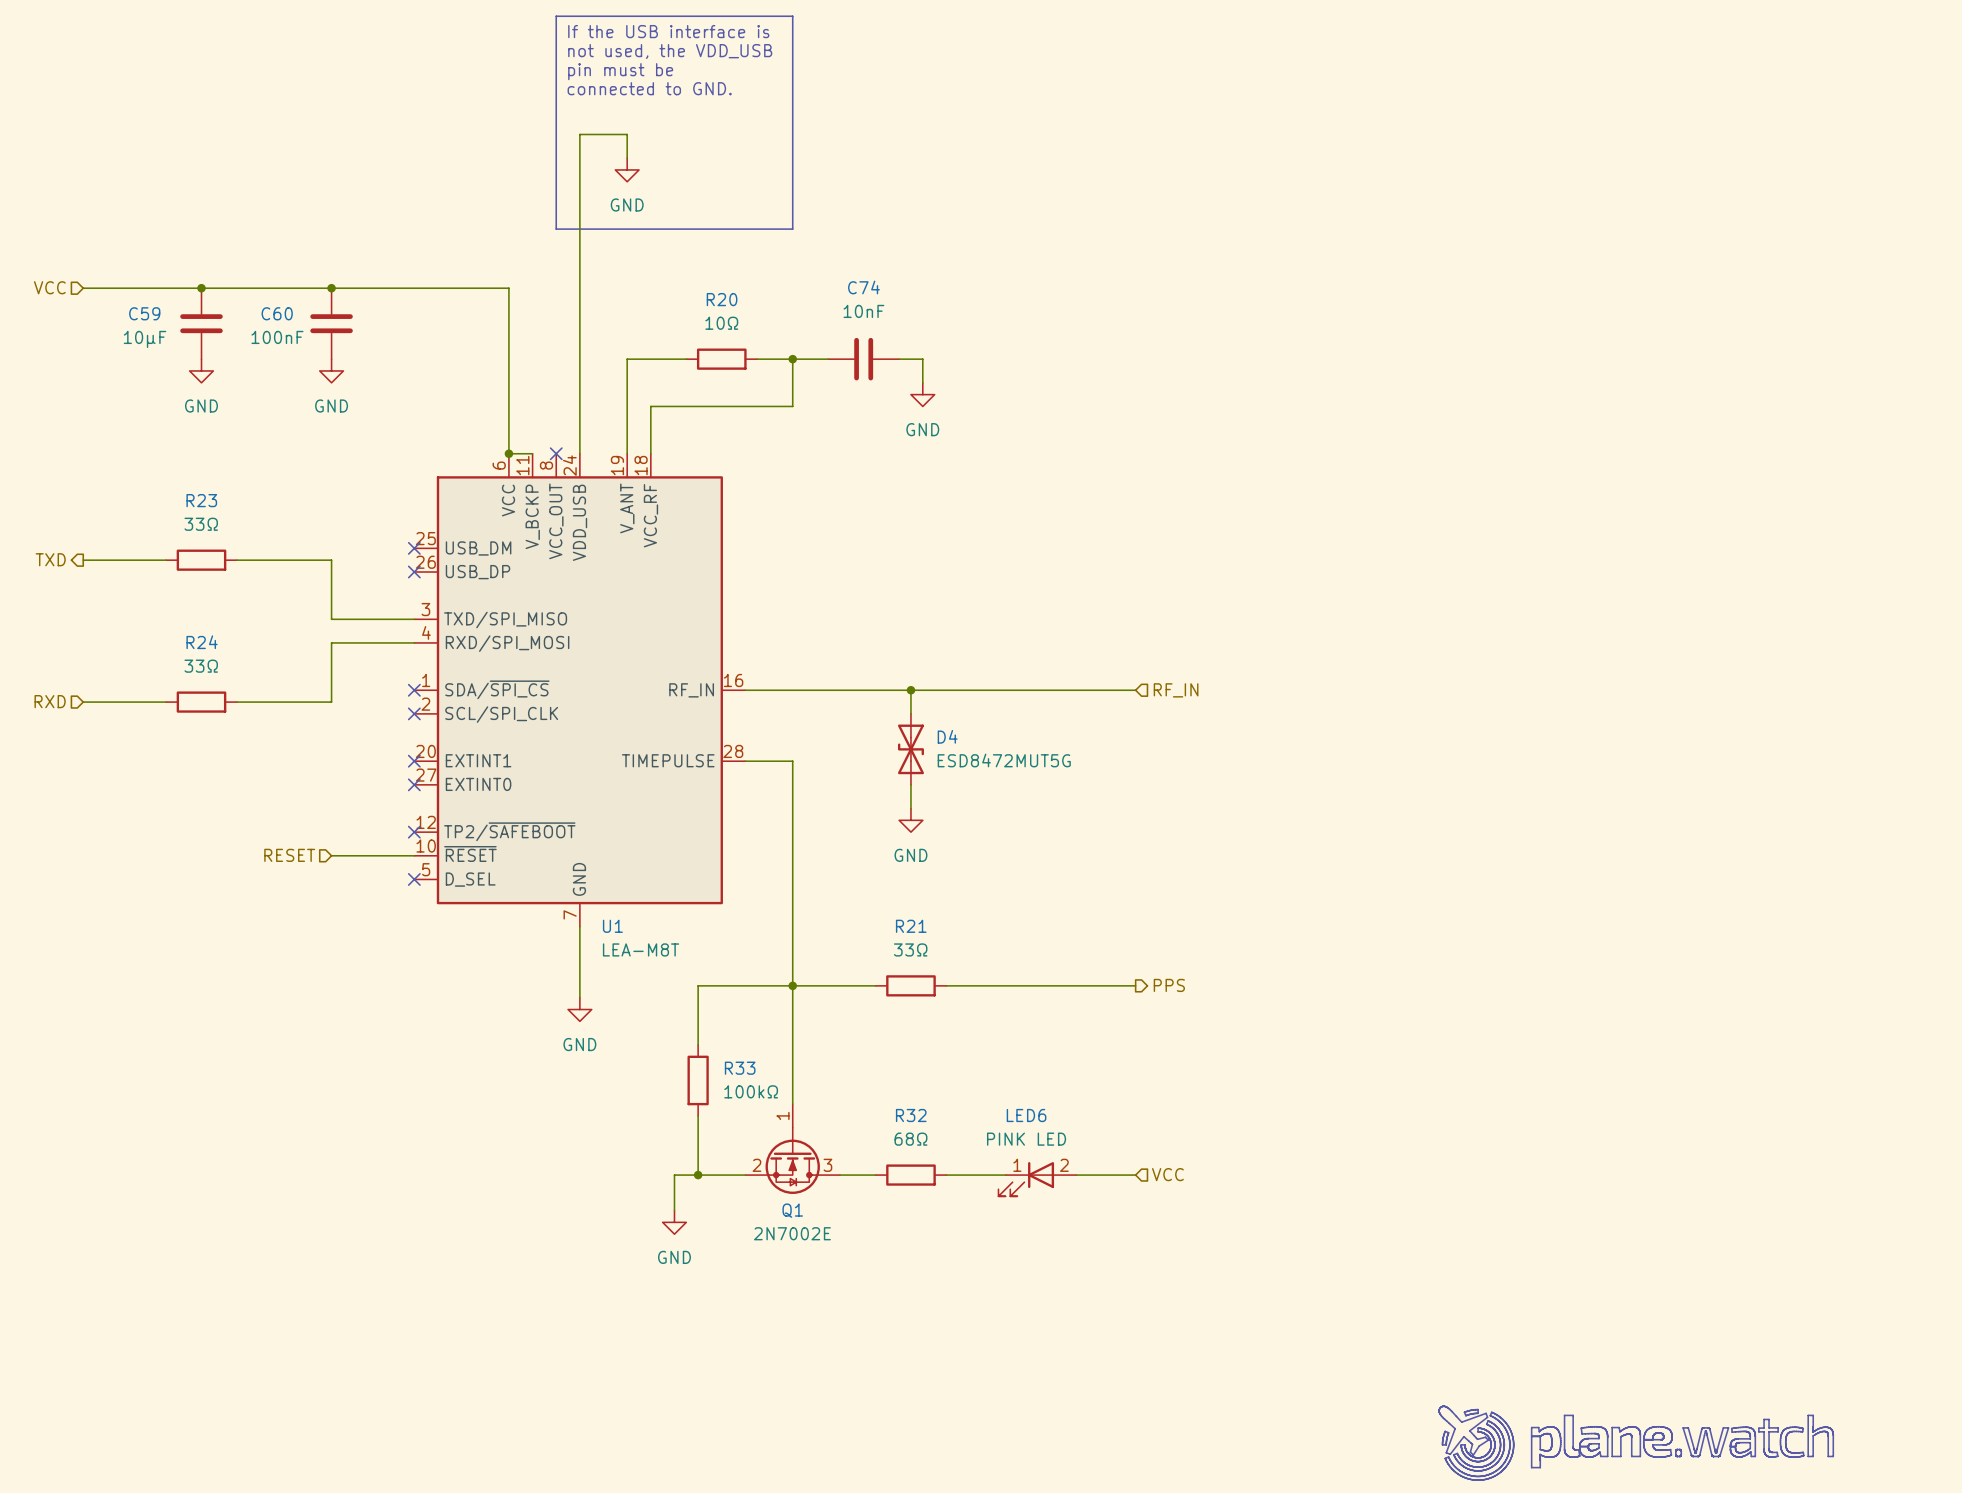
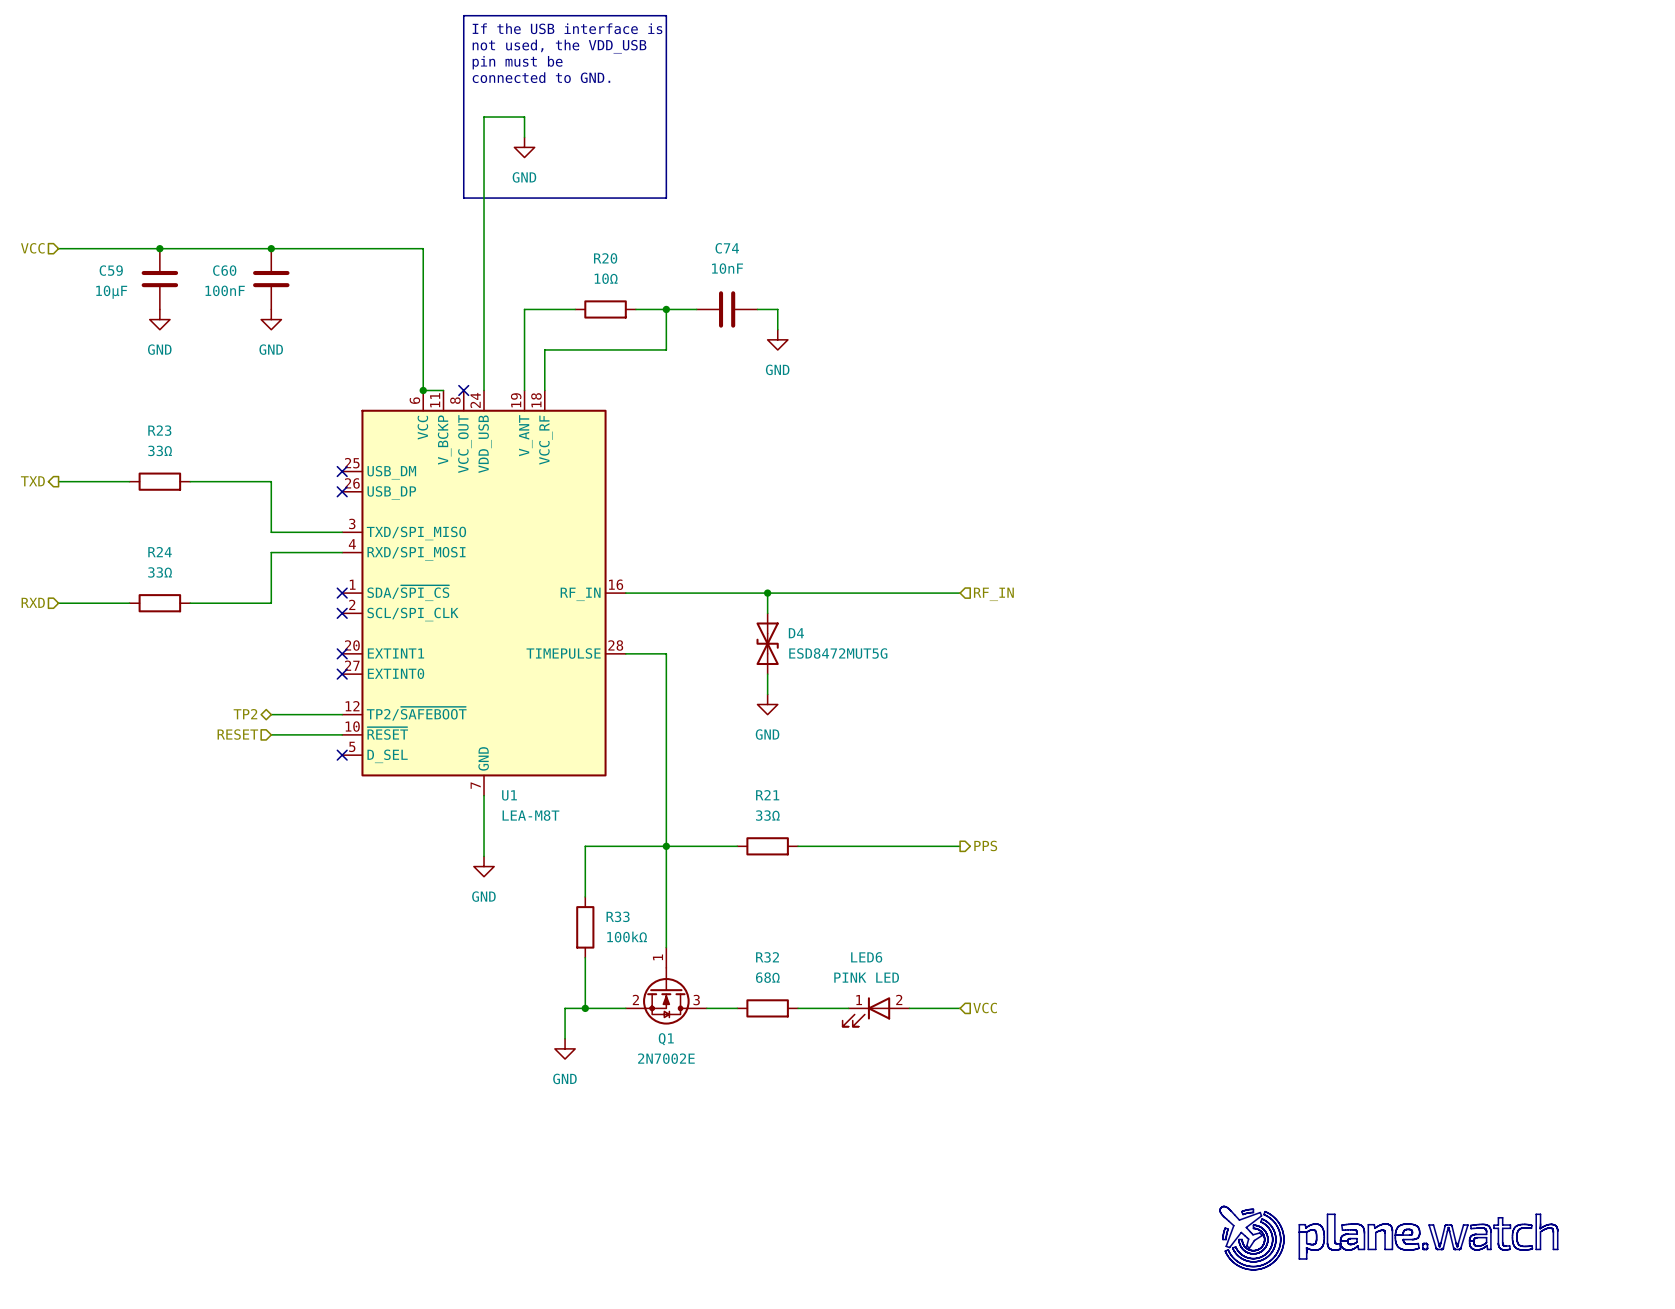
hierarchical label: none -> TP2 (245, 714)
wire: none -> (271, 714) (342, 714)
no-connect mark: (414, 832) -> none

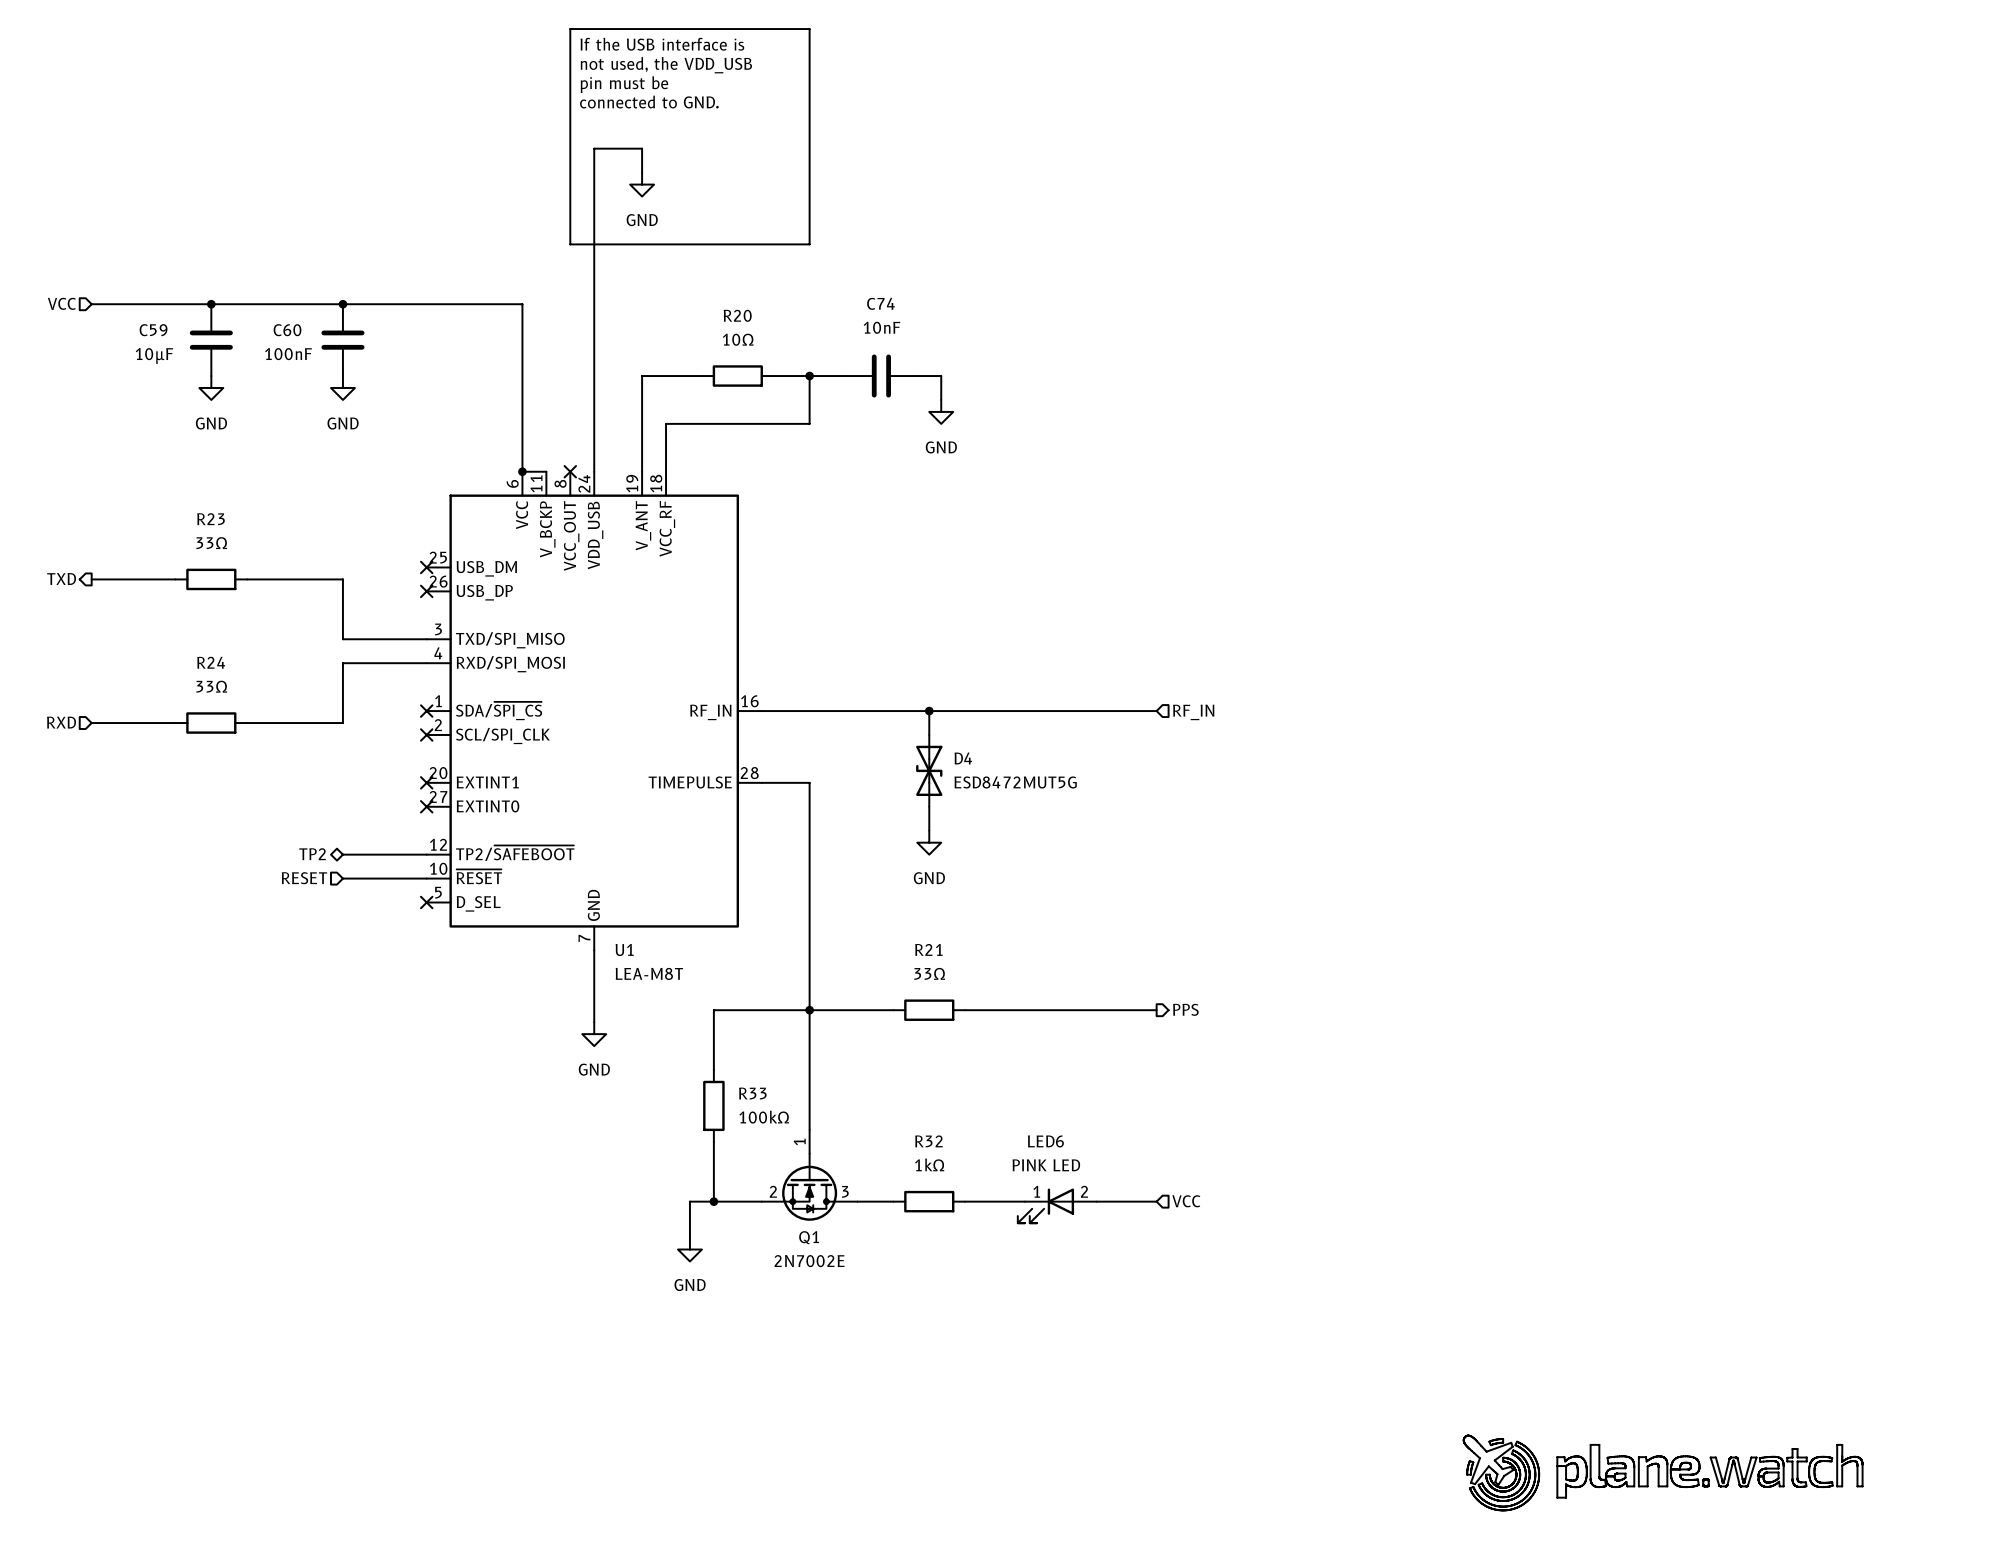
R32 value: 68Ω (767, 977) -> 1kΩ (929, 1164)

